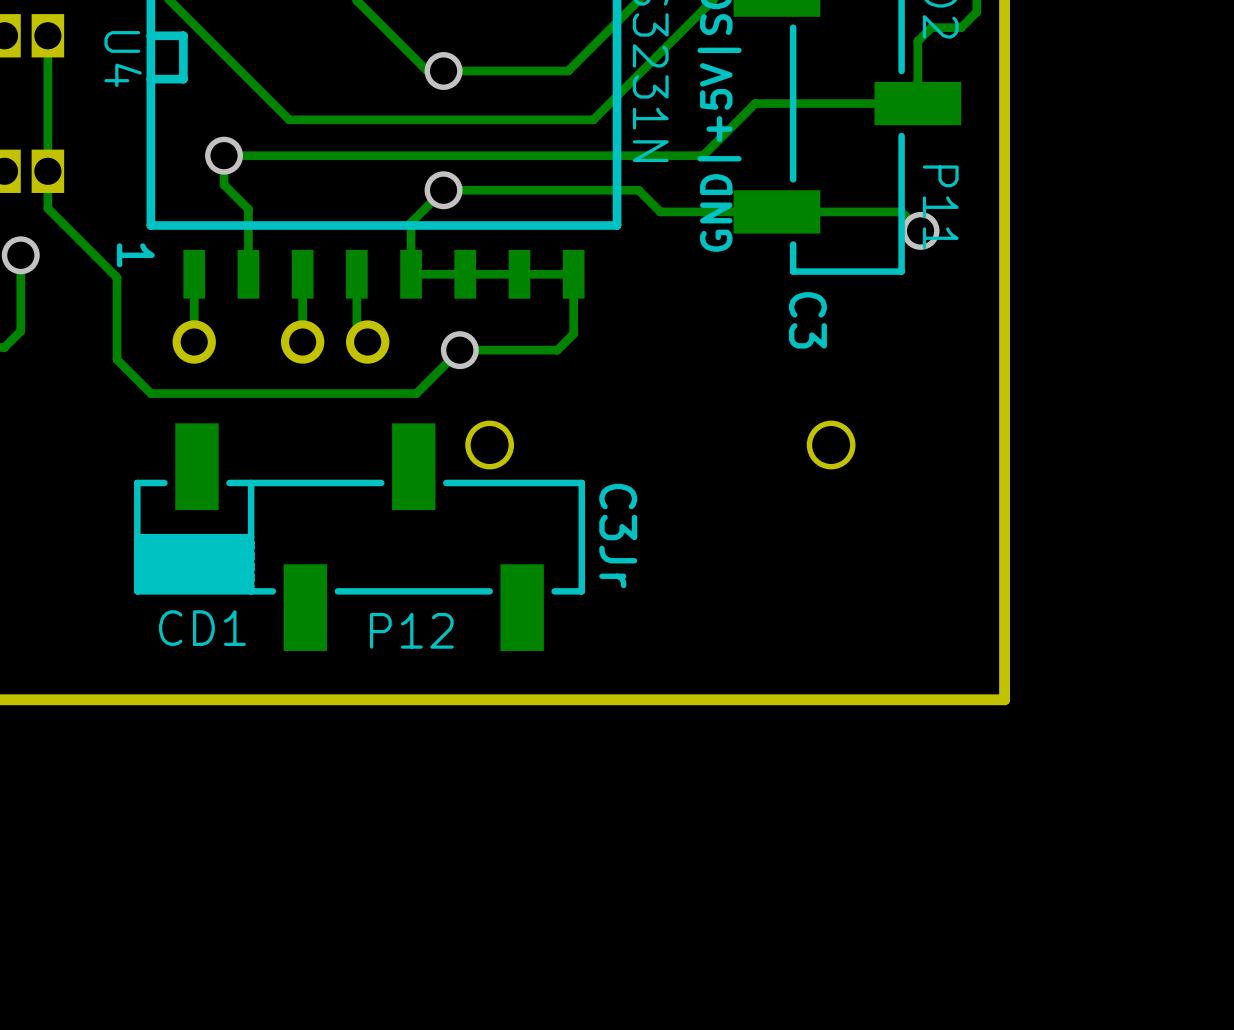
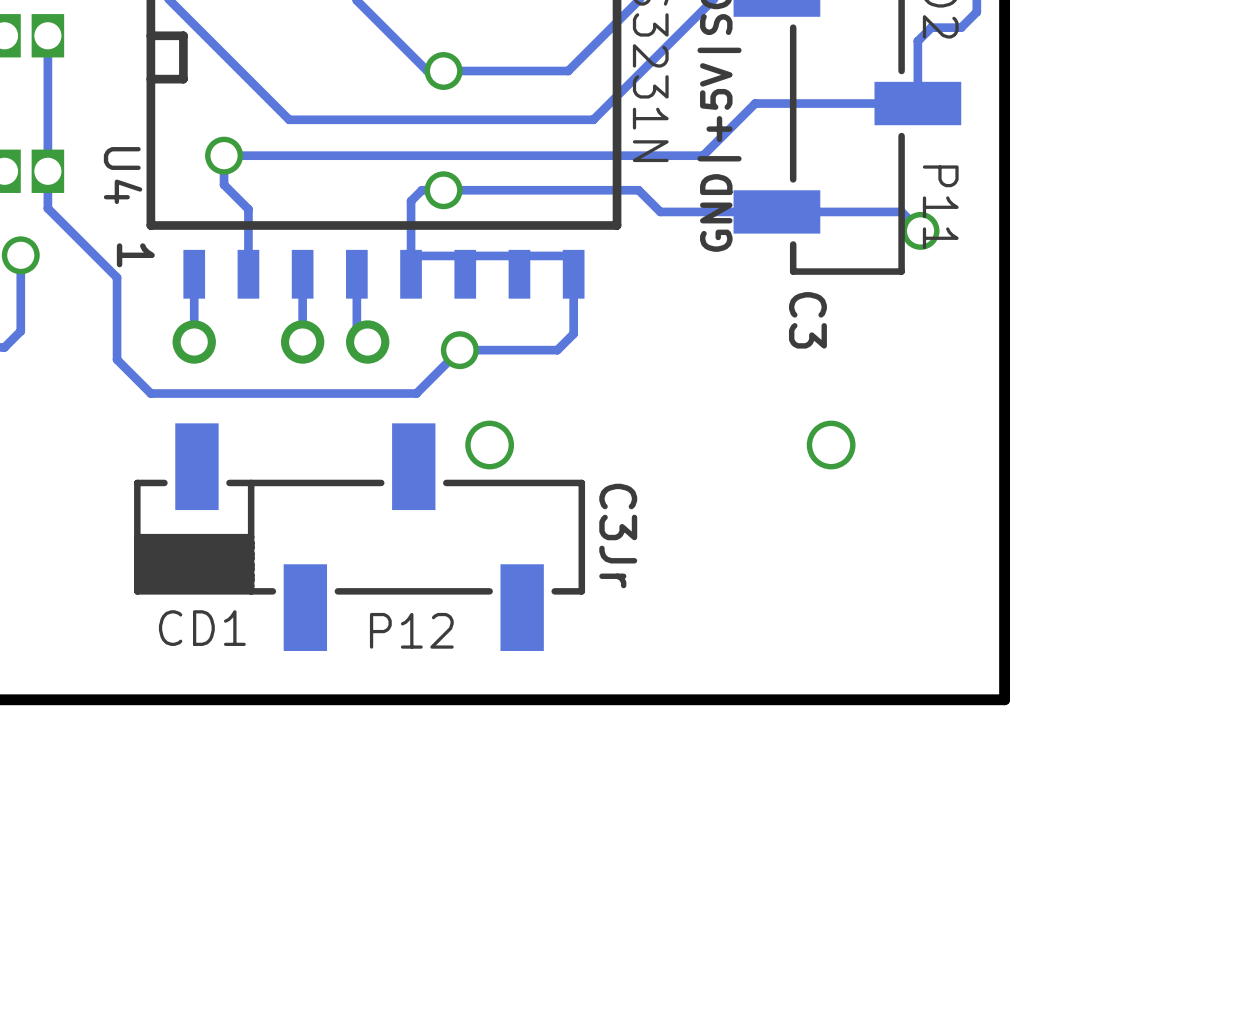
U4 name position: U4 (123, 59) -> U4 (123, 175)
track: (443, 190) (411, 222) -> (443, 190) (421, 190) (411, 201) (411, 222)
track: (411, 255) (411, 274) (573, 274) -> (411, 255) (573, 255) (573, 274)

